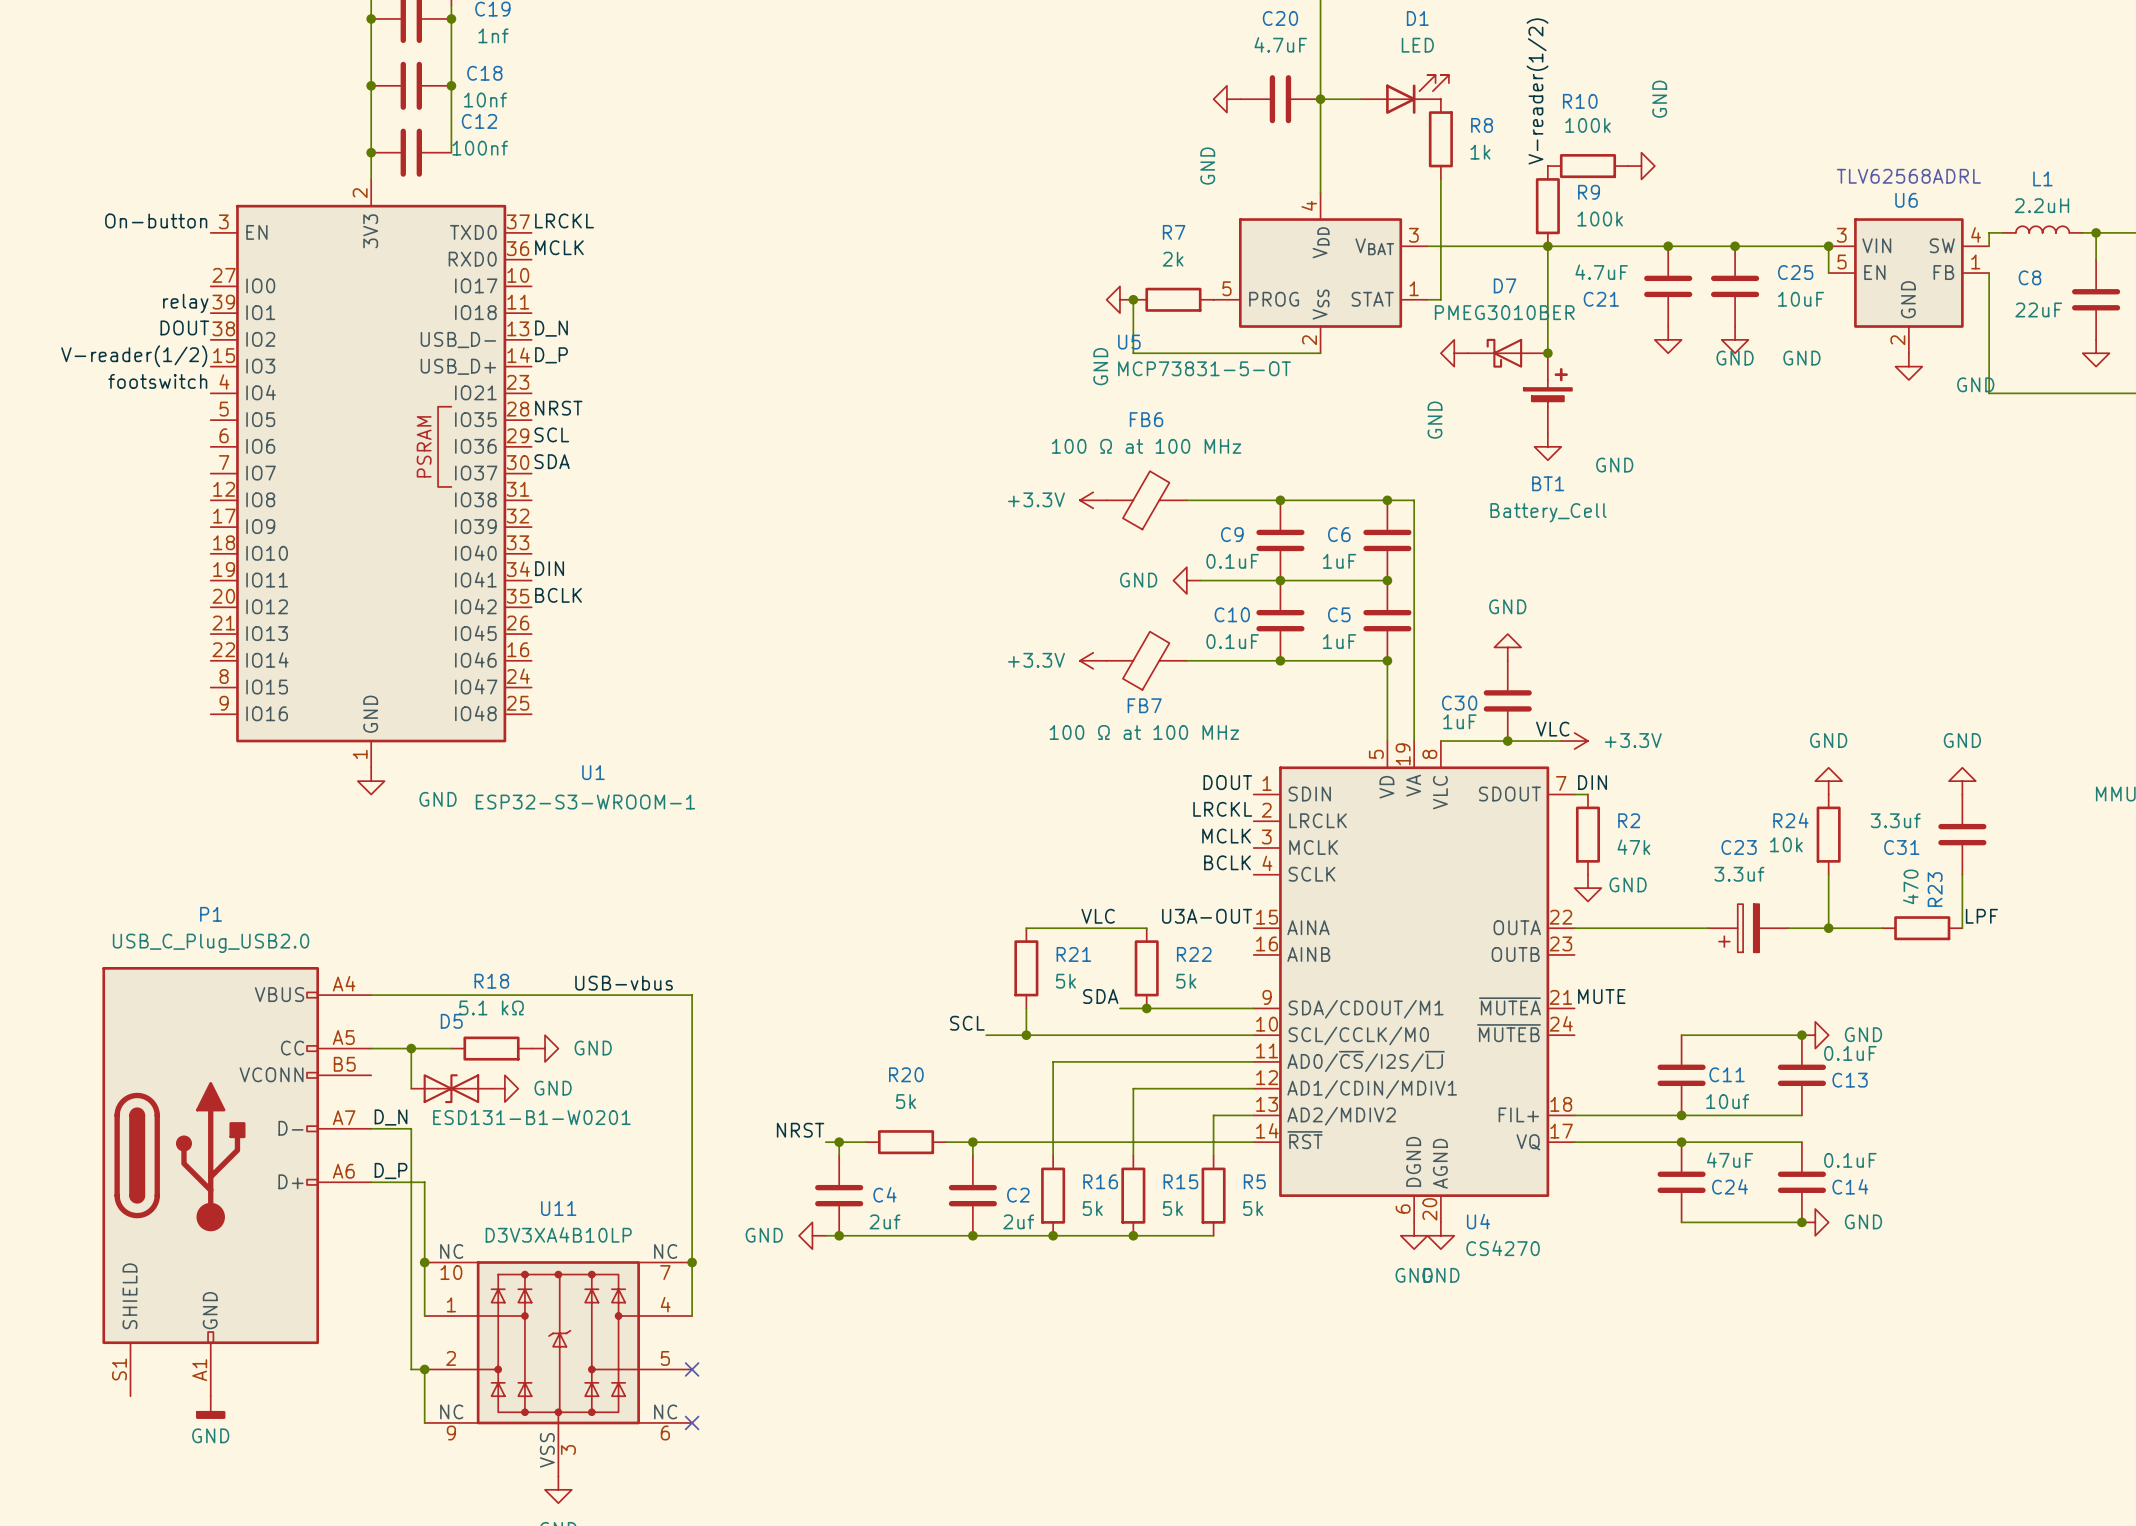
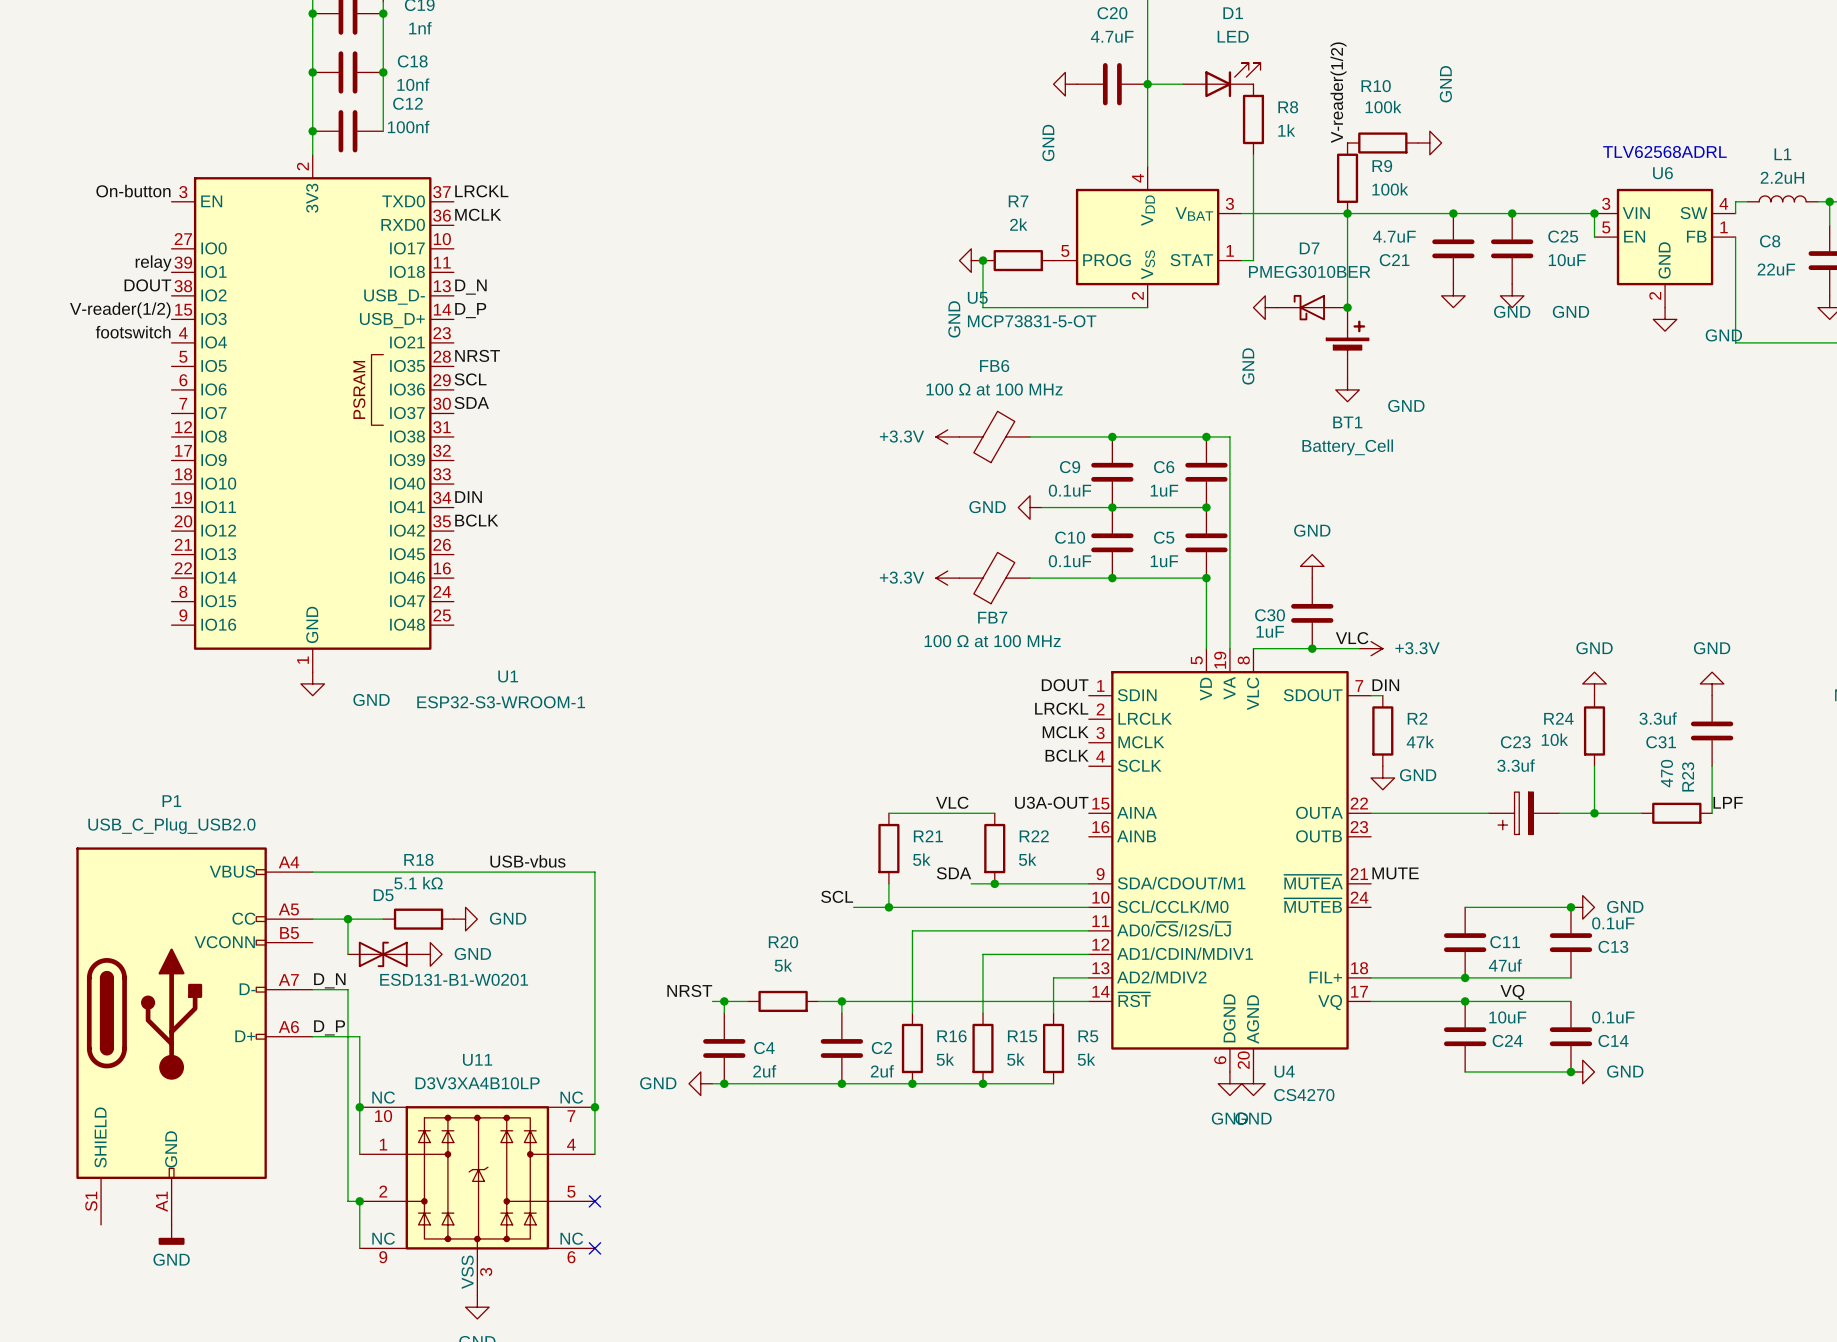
C11 value: 10uf (1727, 1101) -> 47uf (1505, 965)
label: none -> VQ (1512, 992)
C24 value: 47uF (1730, 1160) -> 10uF (1507, 1017)

